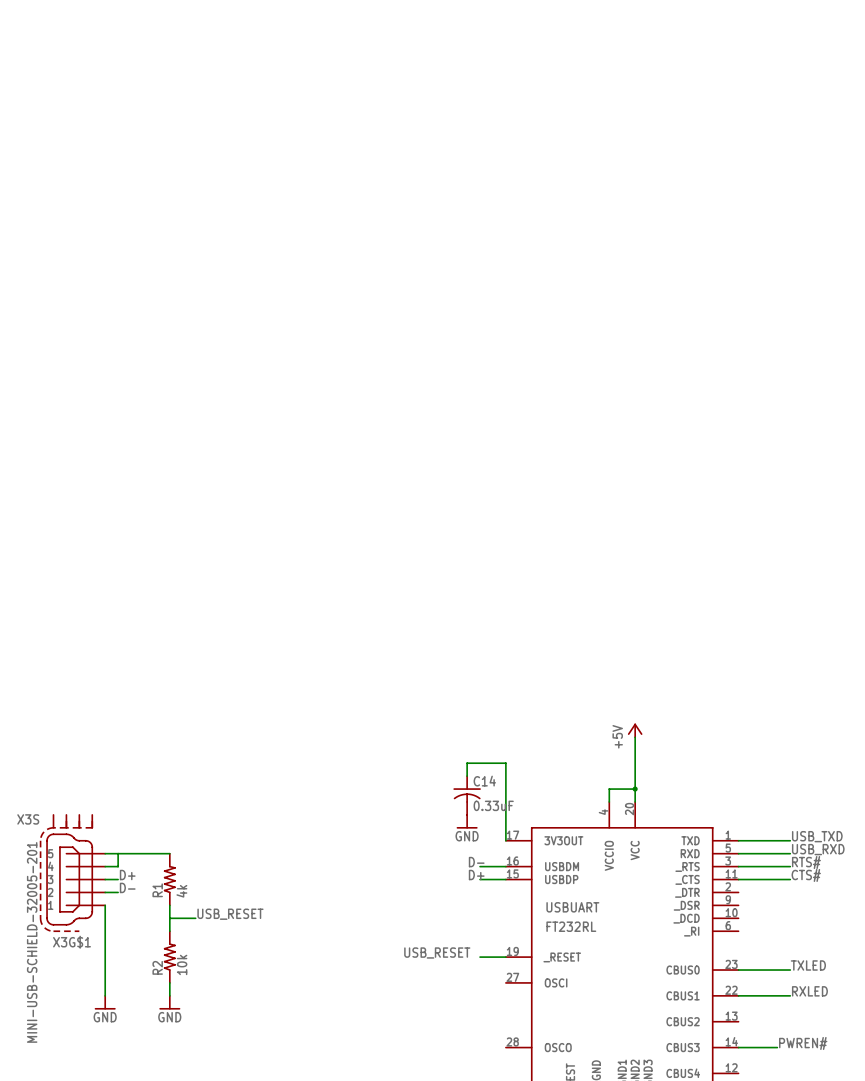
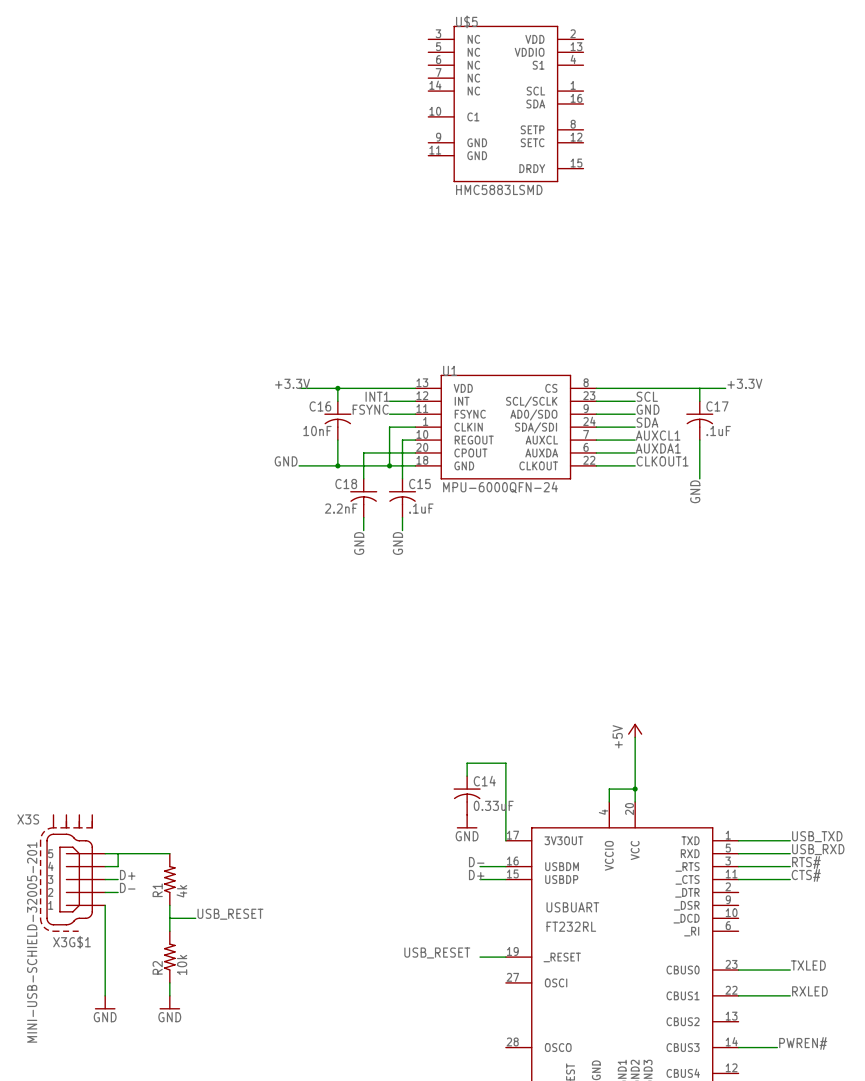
U$5: none -> HMC5883LSMD (505, 103)
label: none -> +3.3V (292, 383)
label: none -> +3.3V (744, 383)
wire: none -> (299, 388) (415, 388)
wire: none -> (337, 388) (337, 401)
junction: none -> (337, 388)
wire: none -> (596, 388) (725, 388)
wire: none -> (699, 388) (699, 401)
label: none -> INT1 (377, 396)
label: none -> SCL (647, 396)
wire: none -> (389, 401) (415, 401)
wire: none -> (596, 401) (635, 401)
label: none -> FSYNC (370, 409)
label: none -> GND (648, 409)
wire: none -> (389, 414) (415, 414)
wire: none -> (596, 414) (635, 414)
C16: none -> 10nF (337, 420)
C17: none -> .1uF (699, 420)
label: none -> SDA (647, 422)
wire: none -> (415, 427) (389, 427) (389, 465)
U1: none -> MPU-6000QFN-24 (505, 427)
wire: none -> (596, 427) (635, 427)
label: none -> AUXCL1 (658, 435)
wire: none -> (337, 440) (337, 465)
wire: none -> (415, 440) (402, 440) (402, 478)
wire: none -> (596, 440) (635, 440)
wire: none -> (699, 440) (699, 478)
label: none -> AUXDA1 (658, 448)
wire: none -> (415, 452) (363, 452) (363, 478)
wire: none -> (596, 452) (635, 452)
label: none -> GND (286, 461)
label: none -> CLKOUT1 (662, 461)
wire: none -> (299, 465) (415, 465)
junction: none -> (337, 465)
junction: none -> (389, 465)
wire: none -> (596, 465) (635, 465)
label: none -> GND (695, 491)
C18: none -> 2.2nF (363, 498)
C15: none -> .1uF (402, 498)
wire: none -> (363, 517) (363, 530)
wire: none -> (402, 517) (402, 530)
label: none -> GND (359, 543)
label: none -> GND (397, 543)

